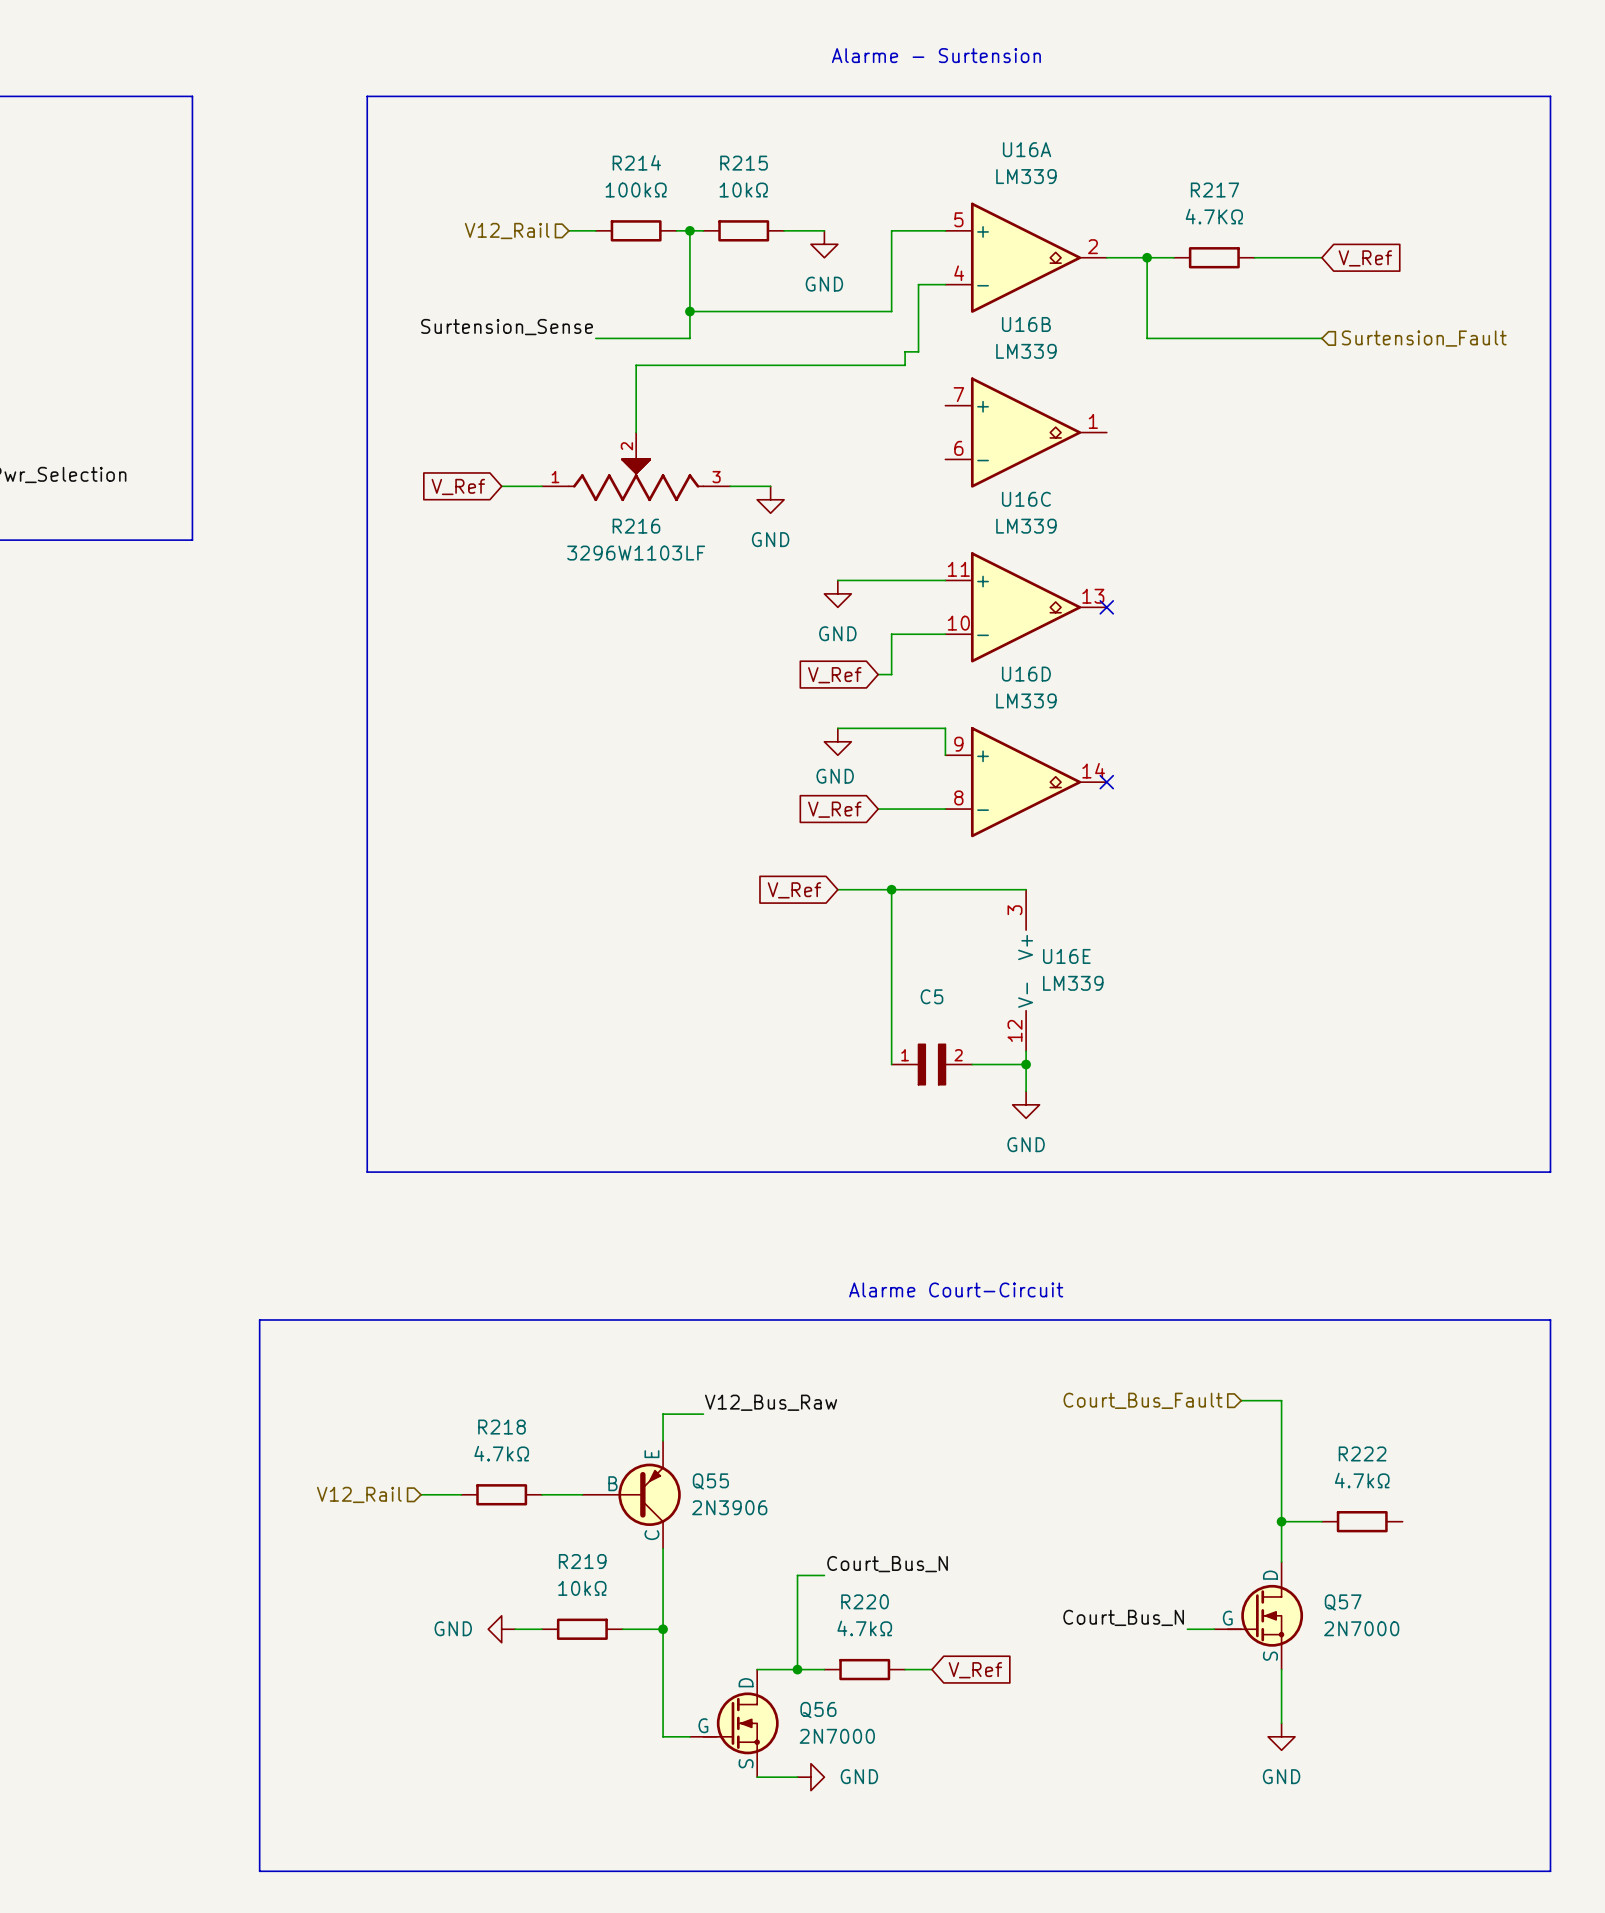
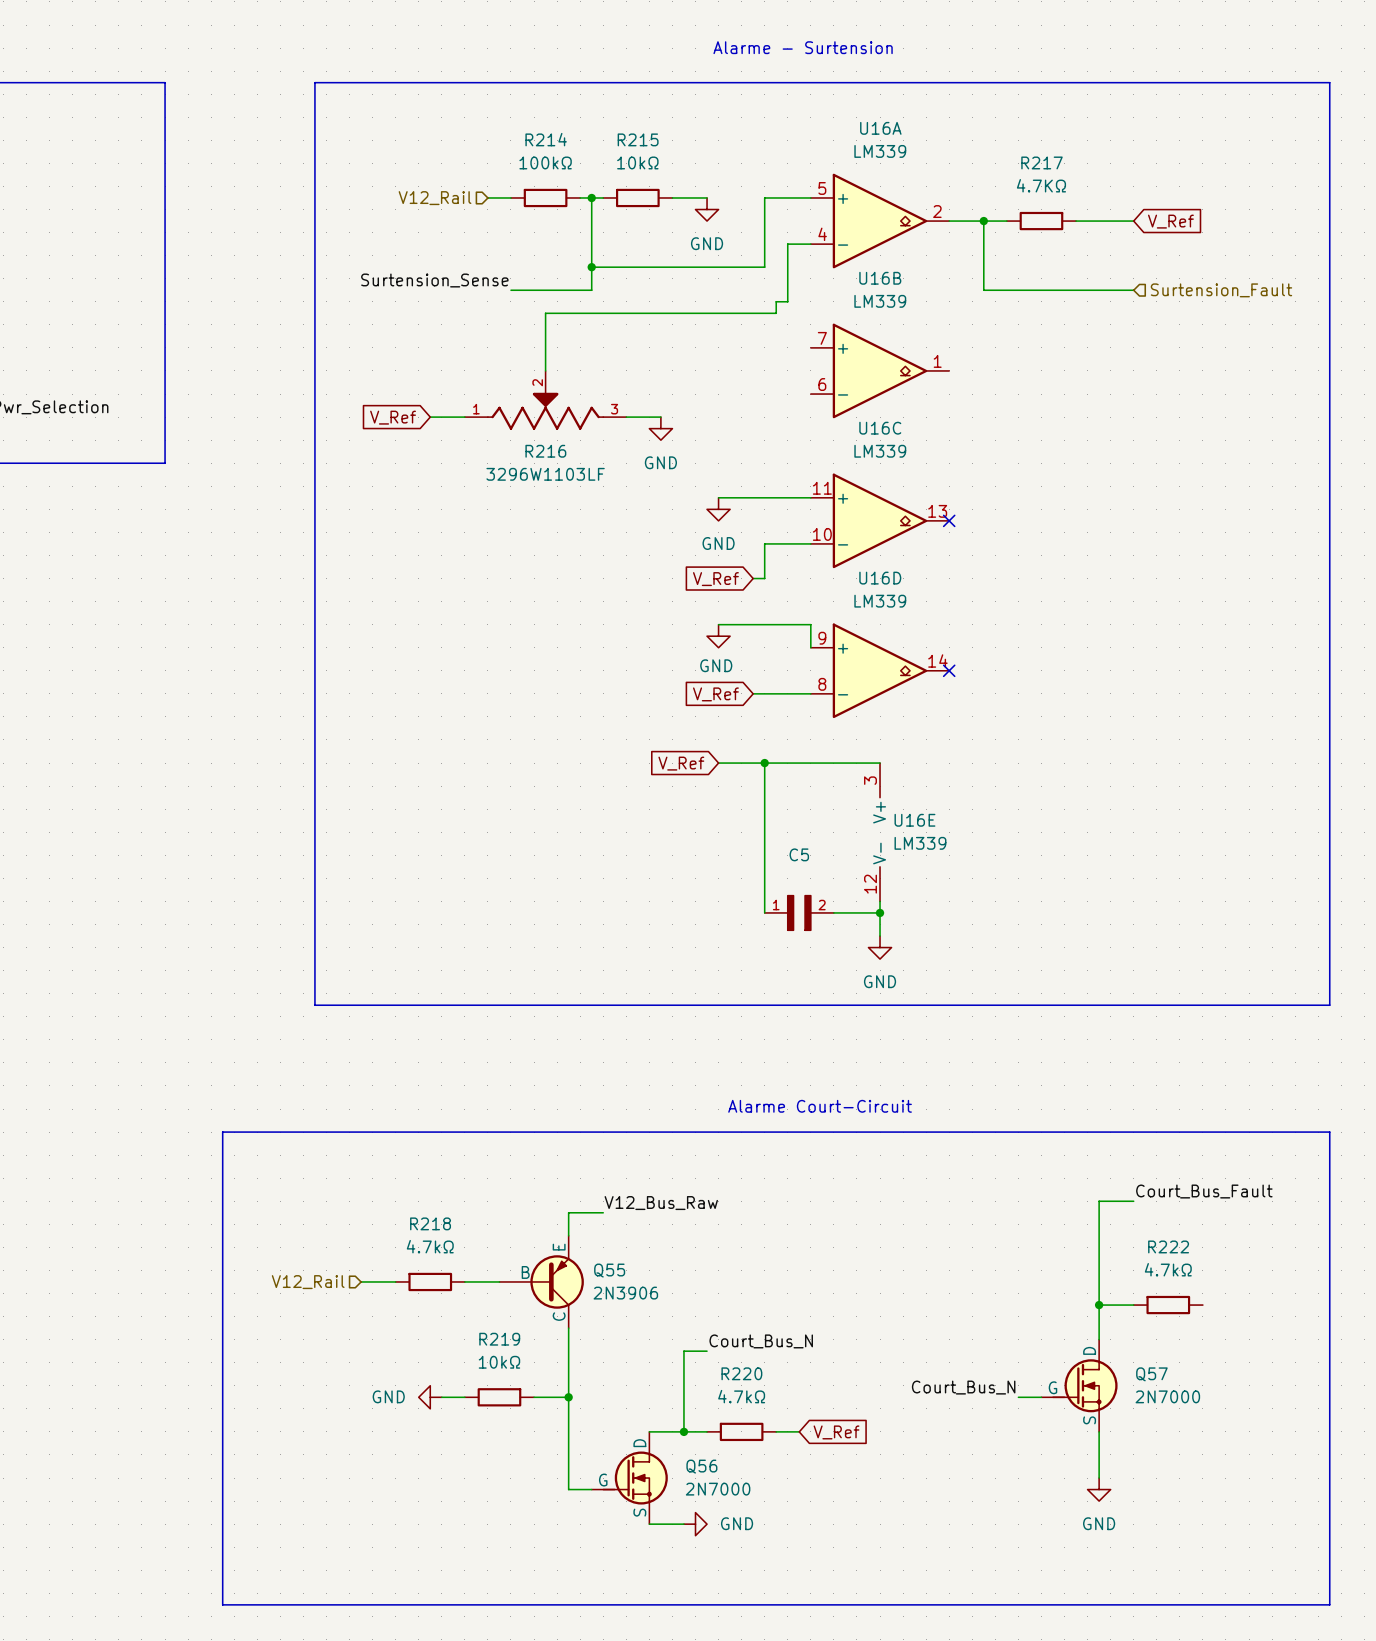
label: none -> Court_Bus_Fault (1204, 1191)
hierarchical label: Court_Bus_Fault (1143, 1400) -> none
wire: (1241, 1400) (1281, 1400) -> (1133, 1201) (1099, 1201)

